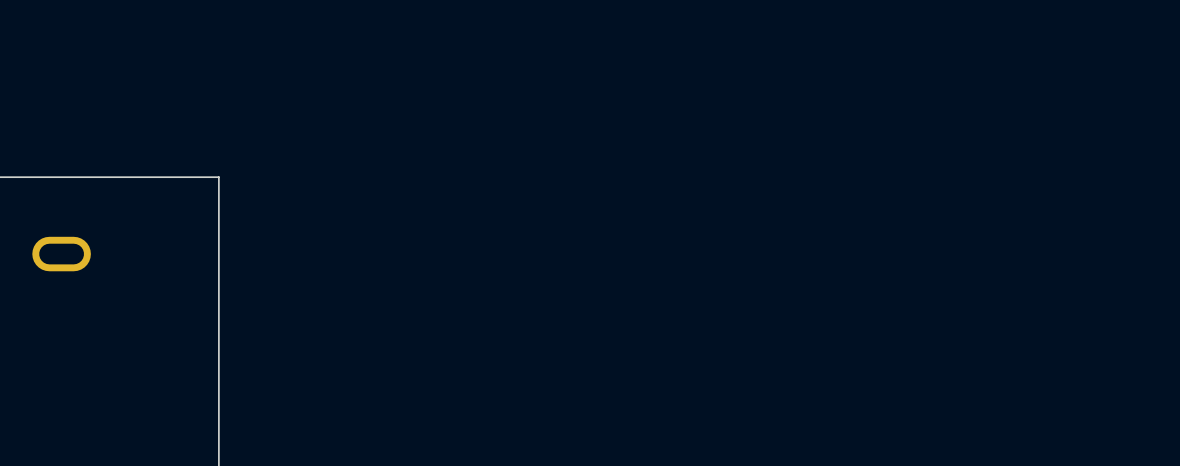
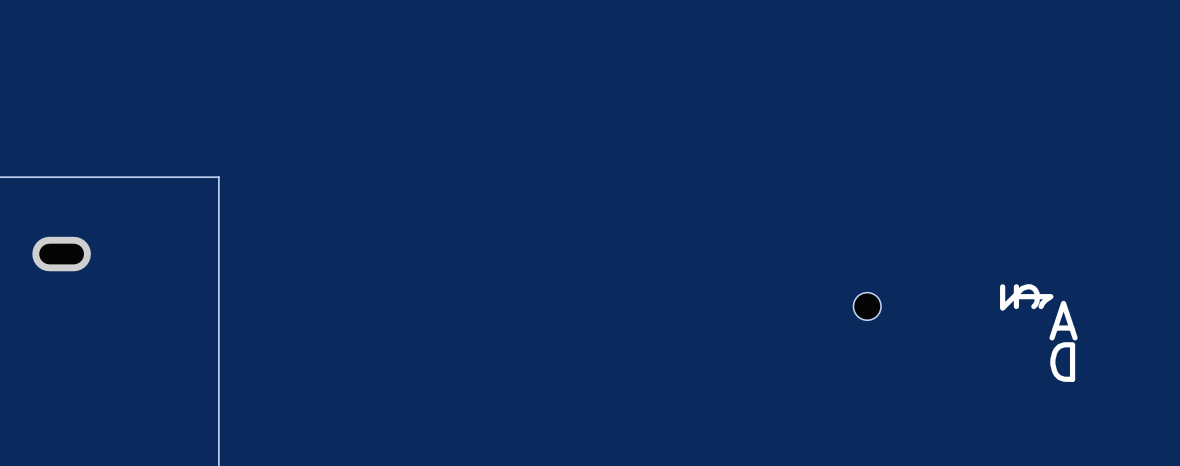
part: none -> (867, 306)
part: none -> (1038, 333)

